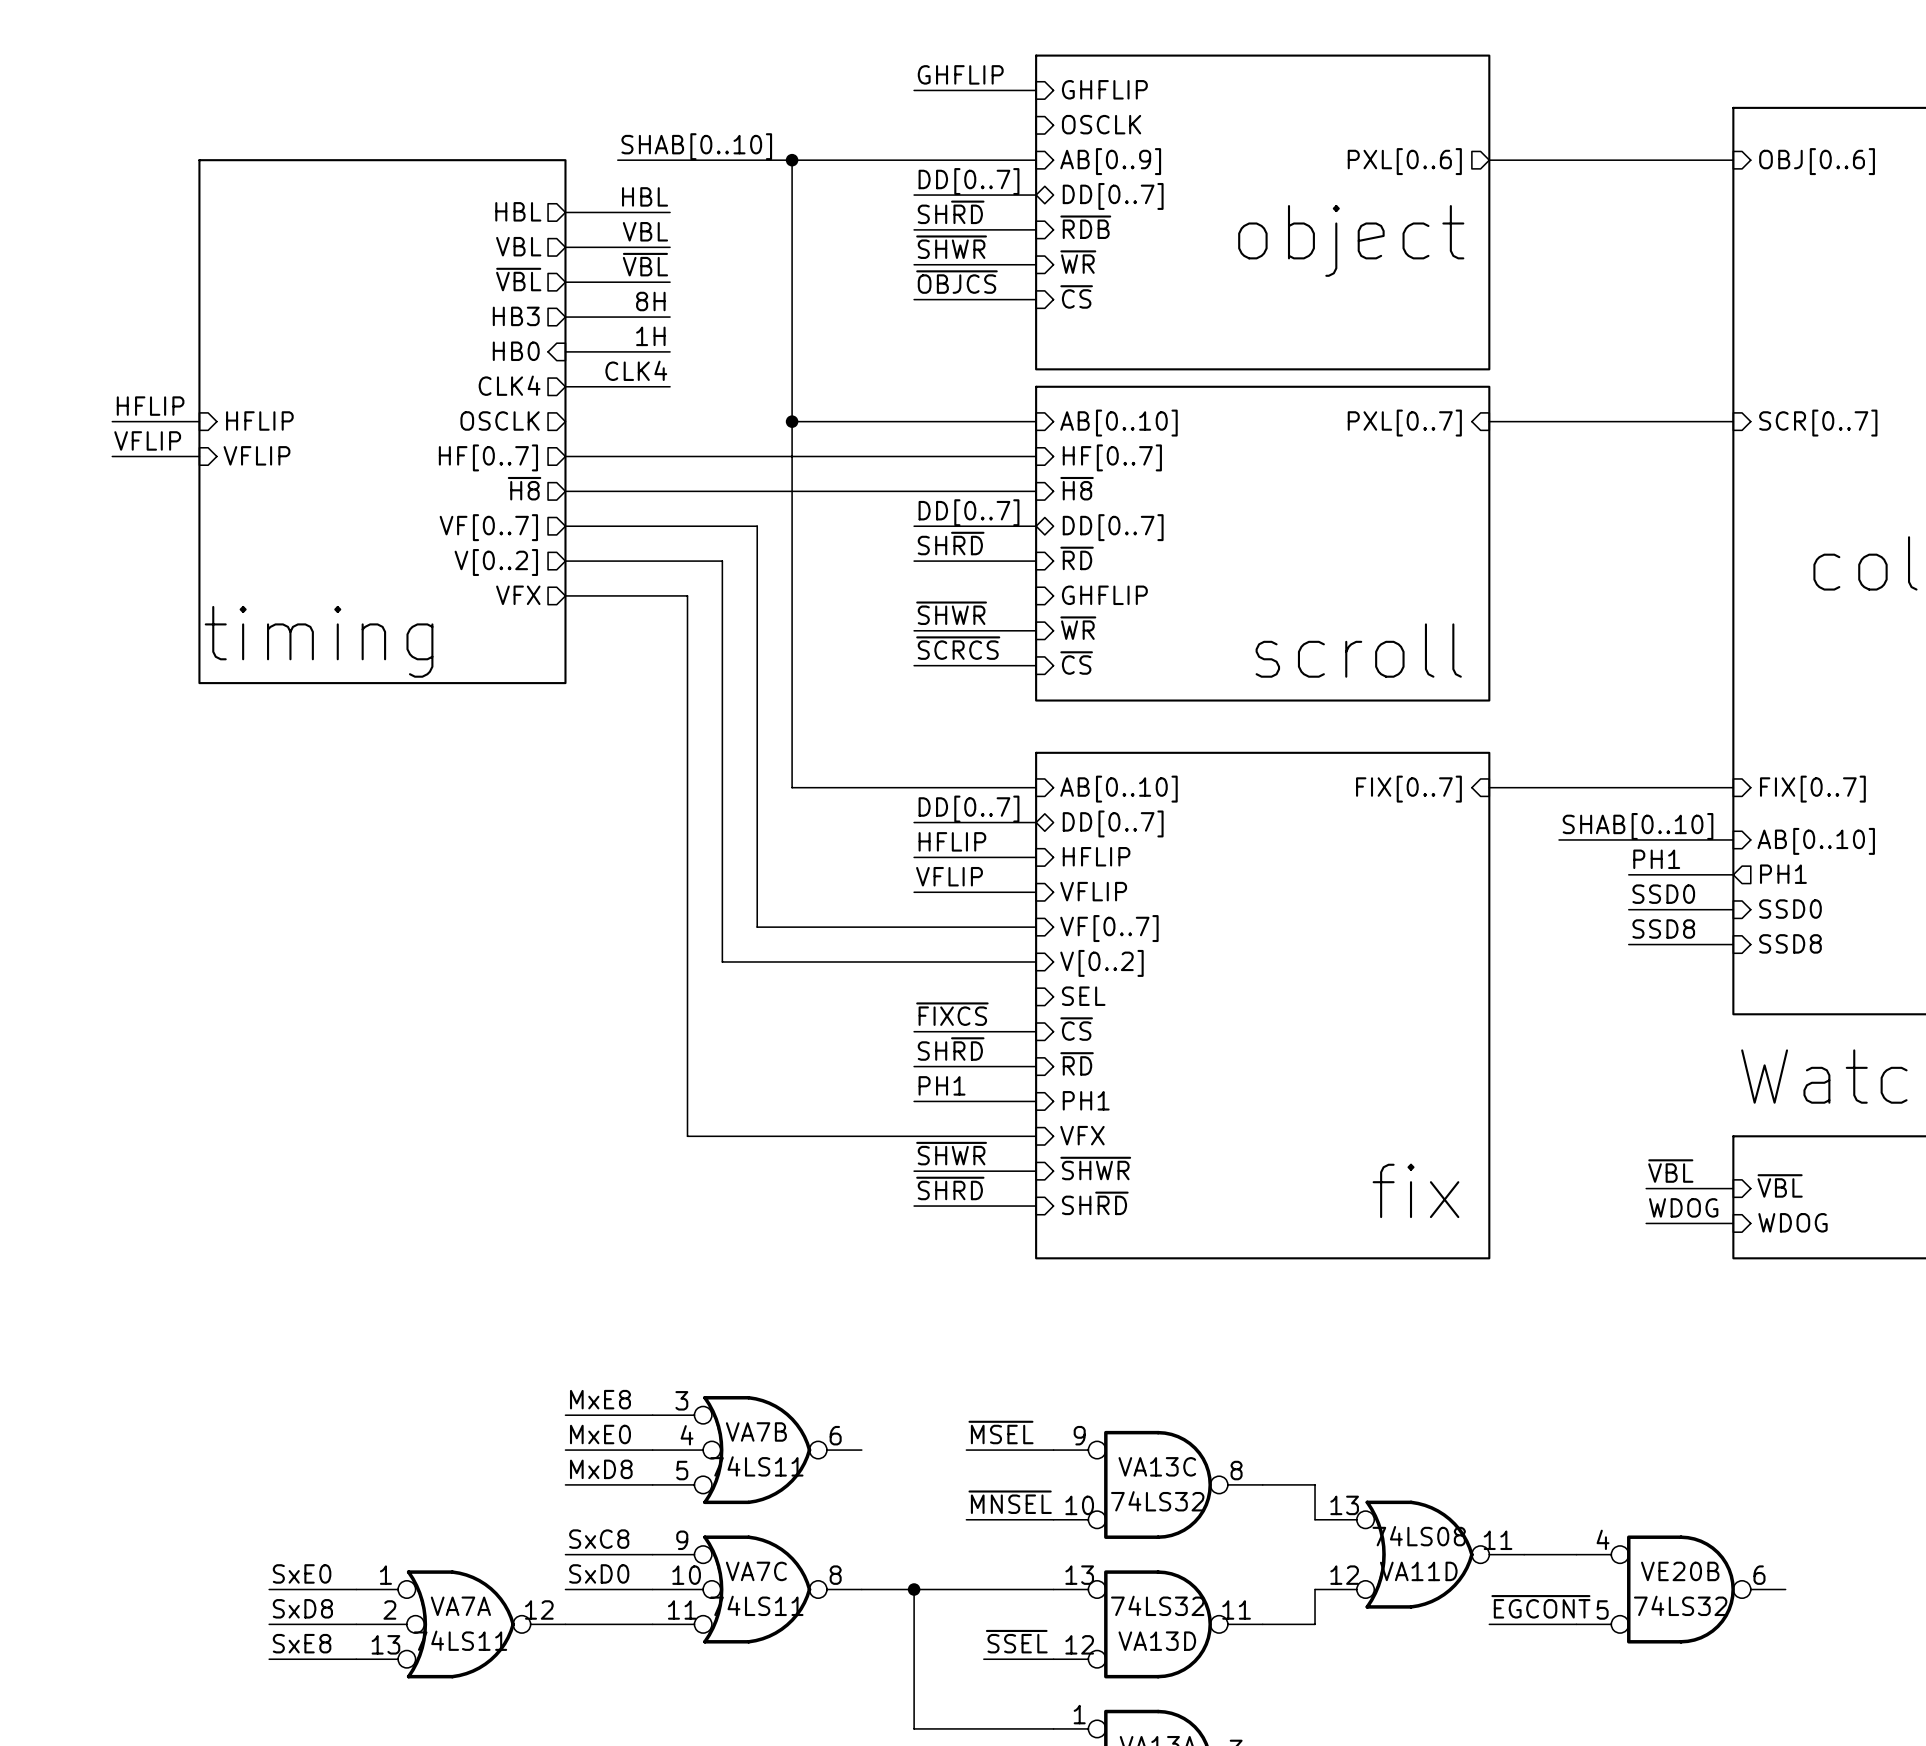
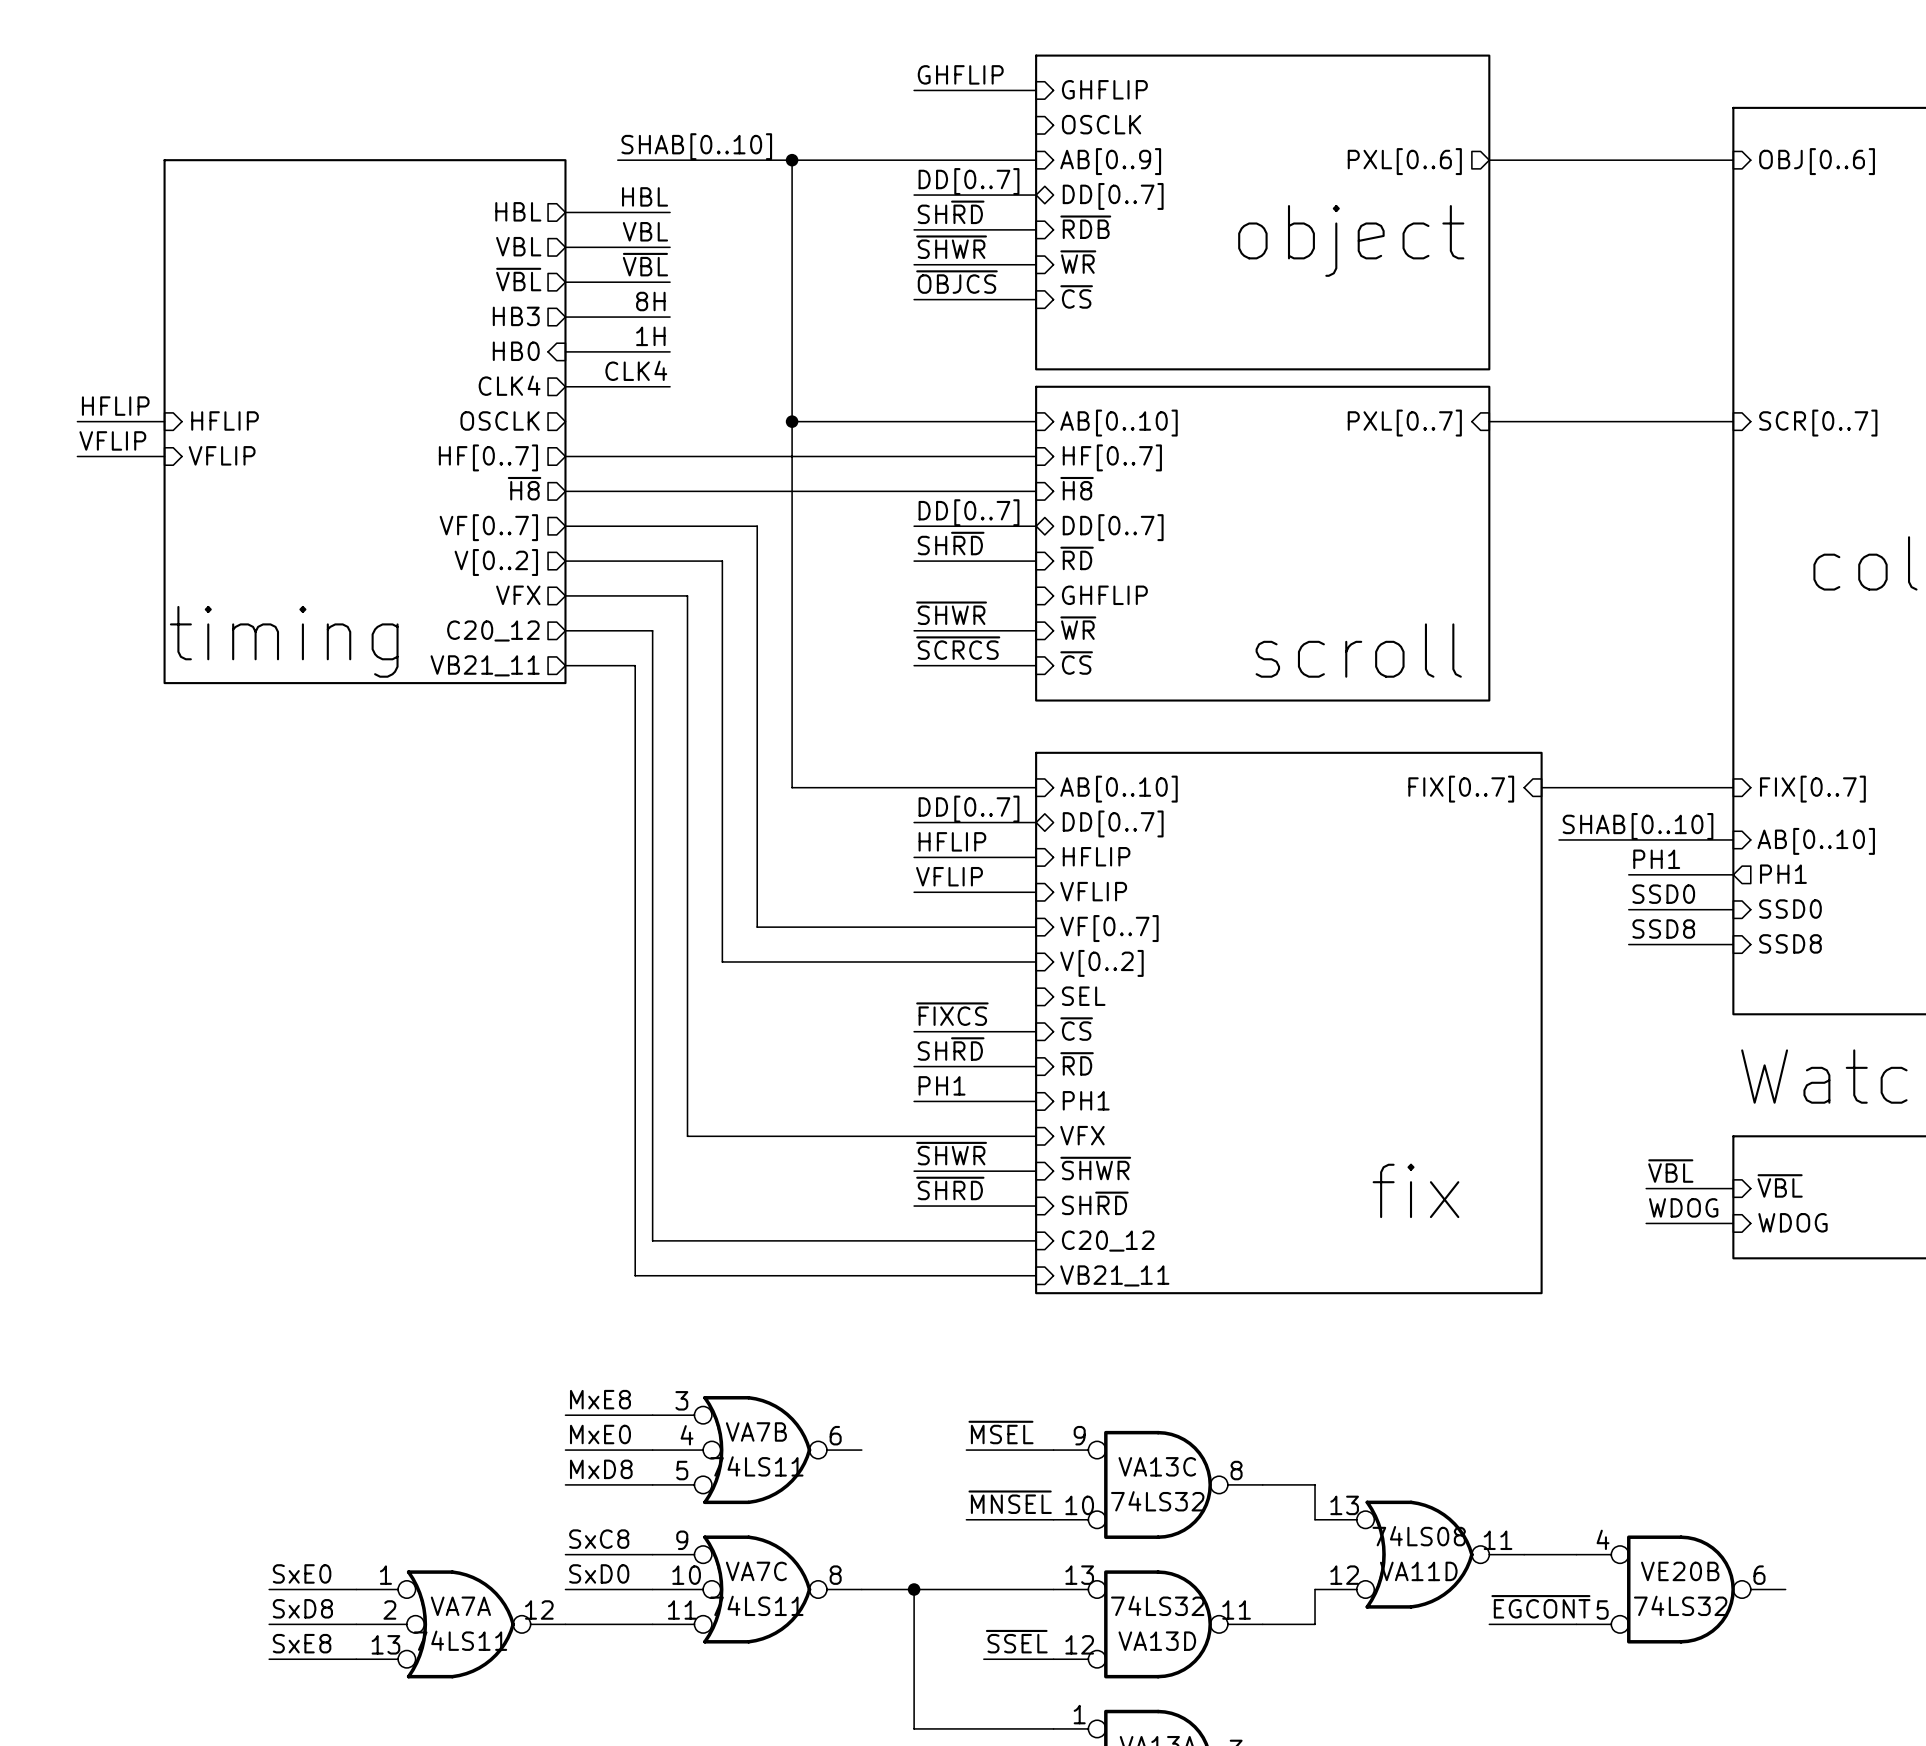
label position: HFLIP (150, 406) -> HFLIP (115, 406)
sheet pin position: HFLIP (259, 420) -> HFLIP (225, 420)
wire: (164, 421) (199, 421) -> (77, 421) (112, 421)
sheet timing: none -> (365, 421)
sheet timing: (382, 421) -> none
label position: VFLIP (147, 440) -> VFLIP (112, 440)
sheet pin position: VFLIP (256, 455) -> VFLIP (222, 455)
wire: (164, 456) (199, 456) -> (77, 456) (112, 456)
sheet pin: none -> C20_12 (493, 630)
wire: none -> (565, 630) (652, 630) (652, 1240) (1036, 1240)
sheet pin: none -> VB21_11 (485, 665)
wire: none -> (565, 665) (635, 665) (635, 1275) (1036, 1275)
bus: (1489, 787) (1541, 787) -> none
sheet pin position: FIX[0..7] (1408, 789) -> FIX[0..7] (1461, 789)
sheet fix: (1262, 1005) -> none
sheet fix: none -> (1288, 1023)
sheet pin: none -> C20_12 (1108, 1241)
sheet pin: none -> VB21_11 (1114, 1275)

